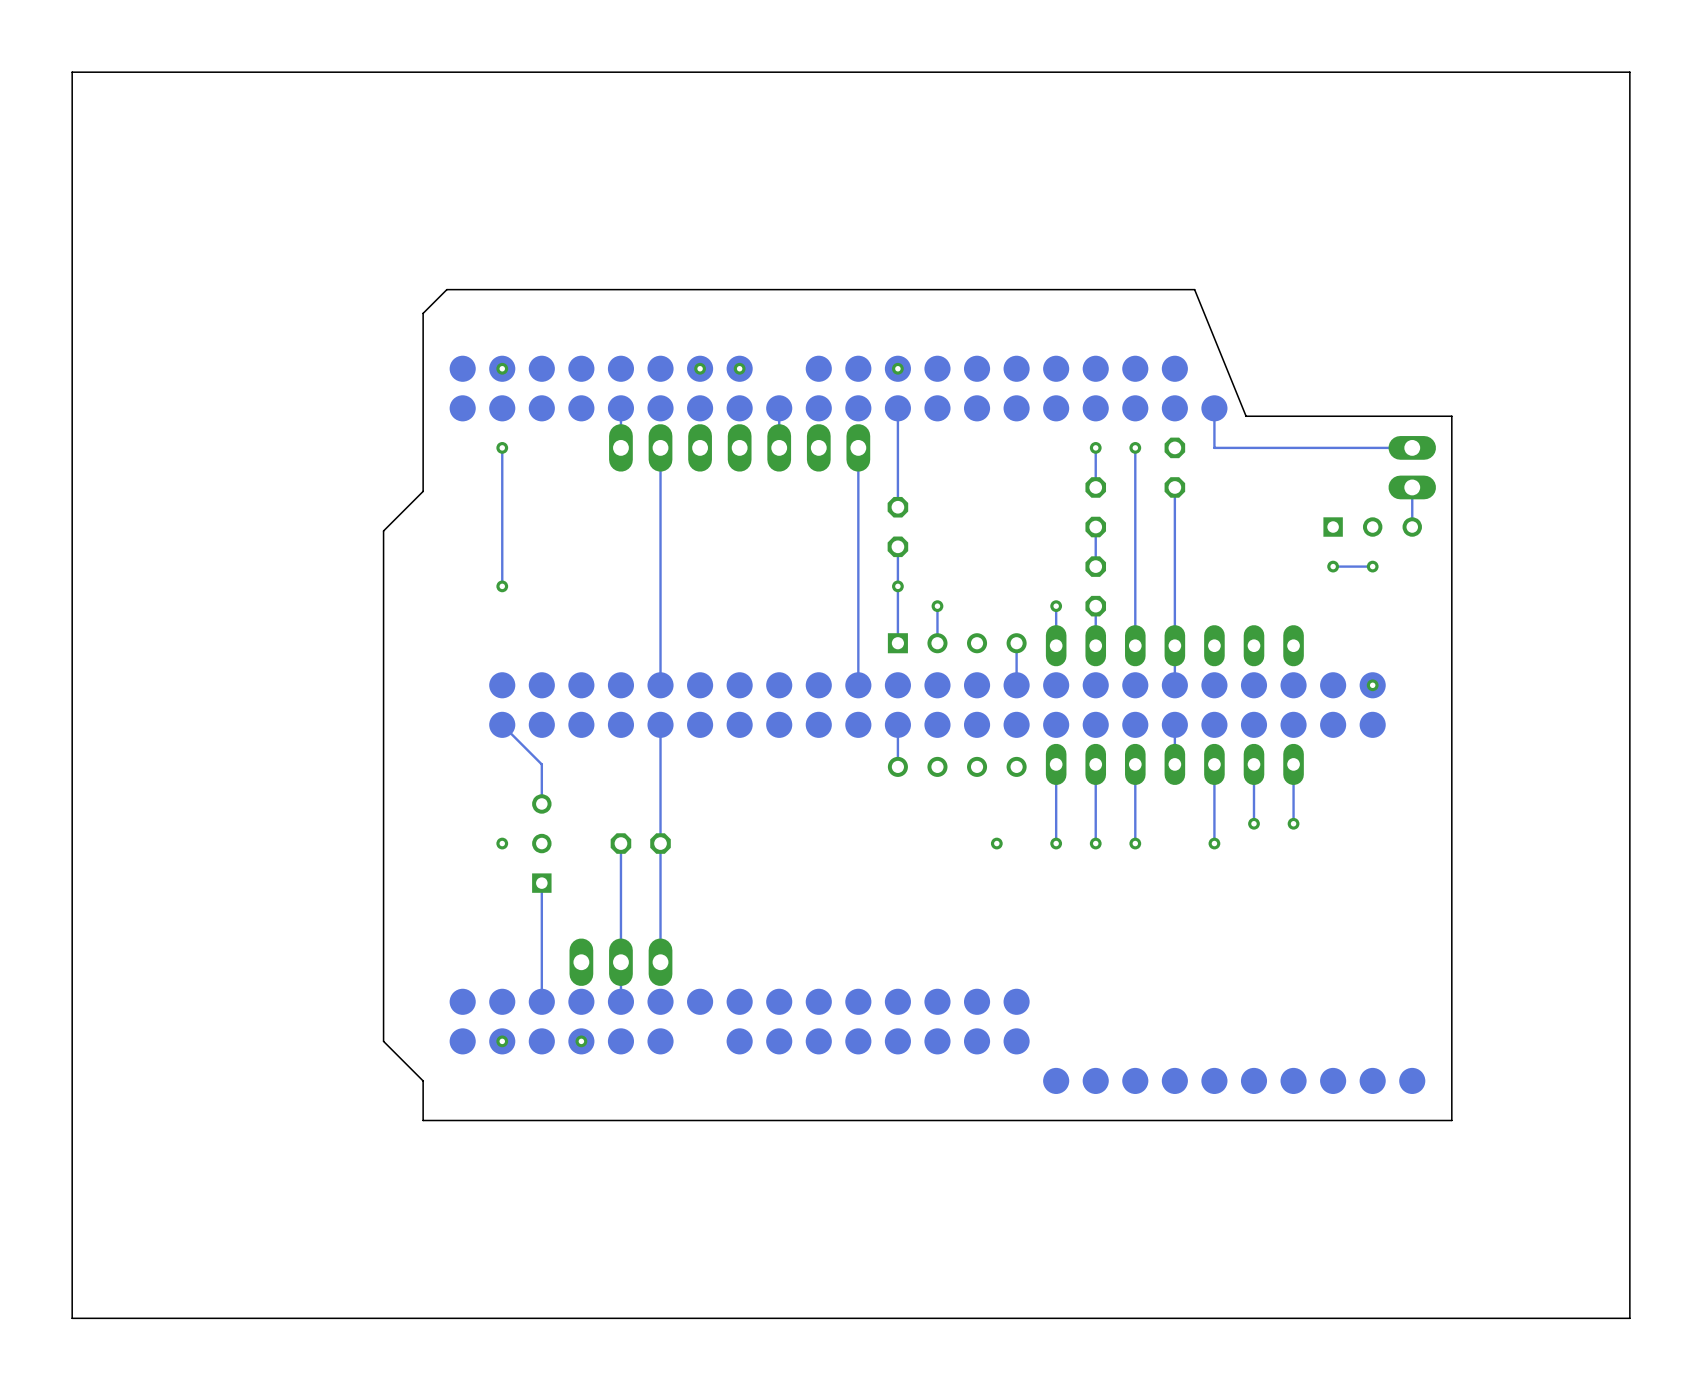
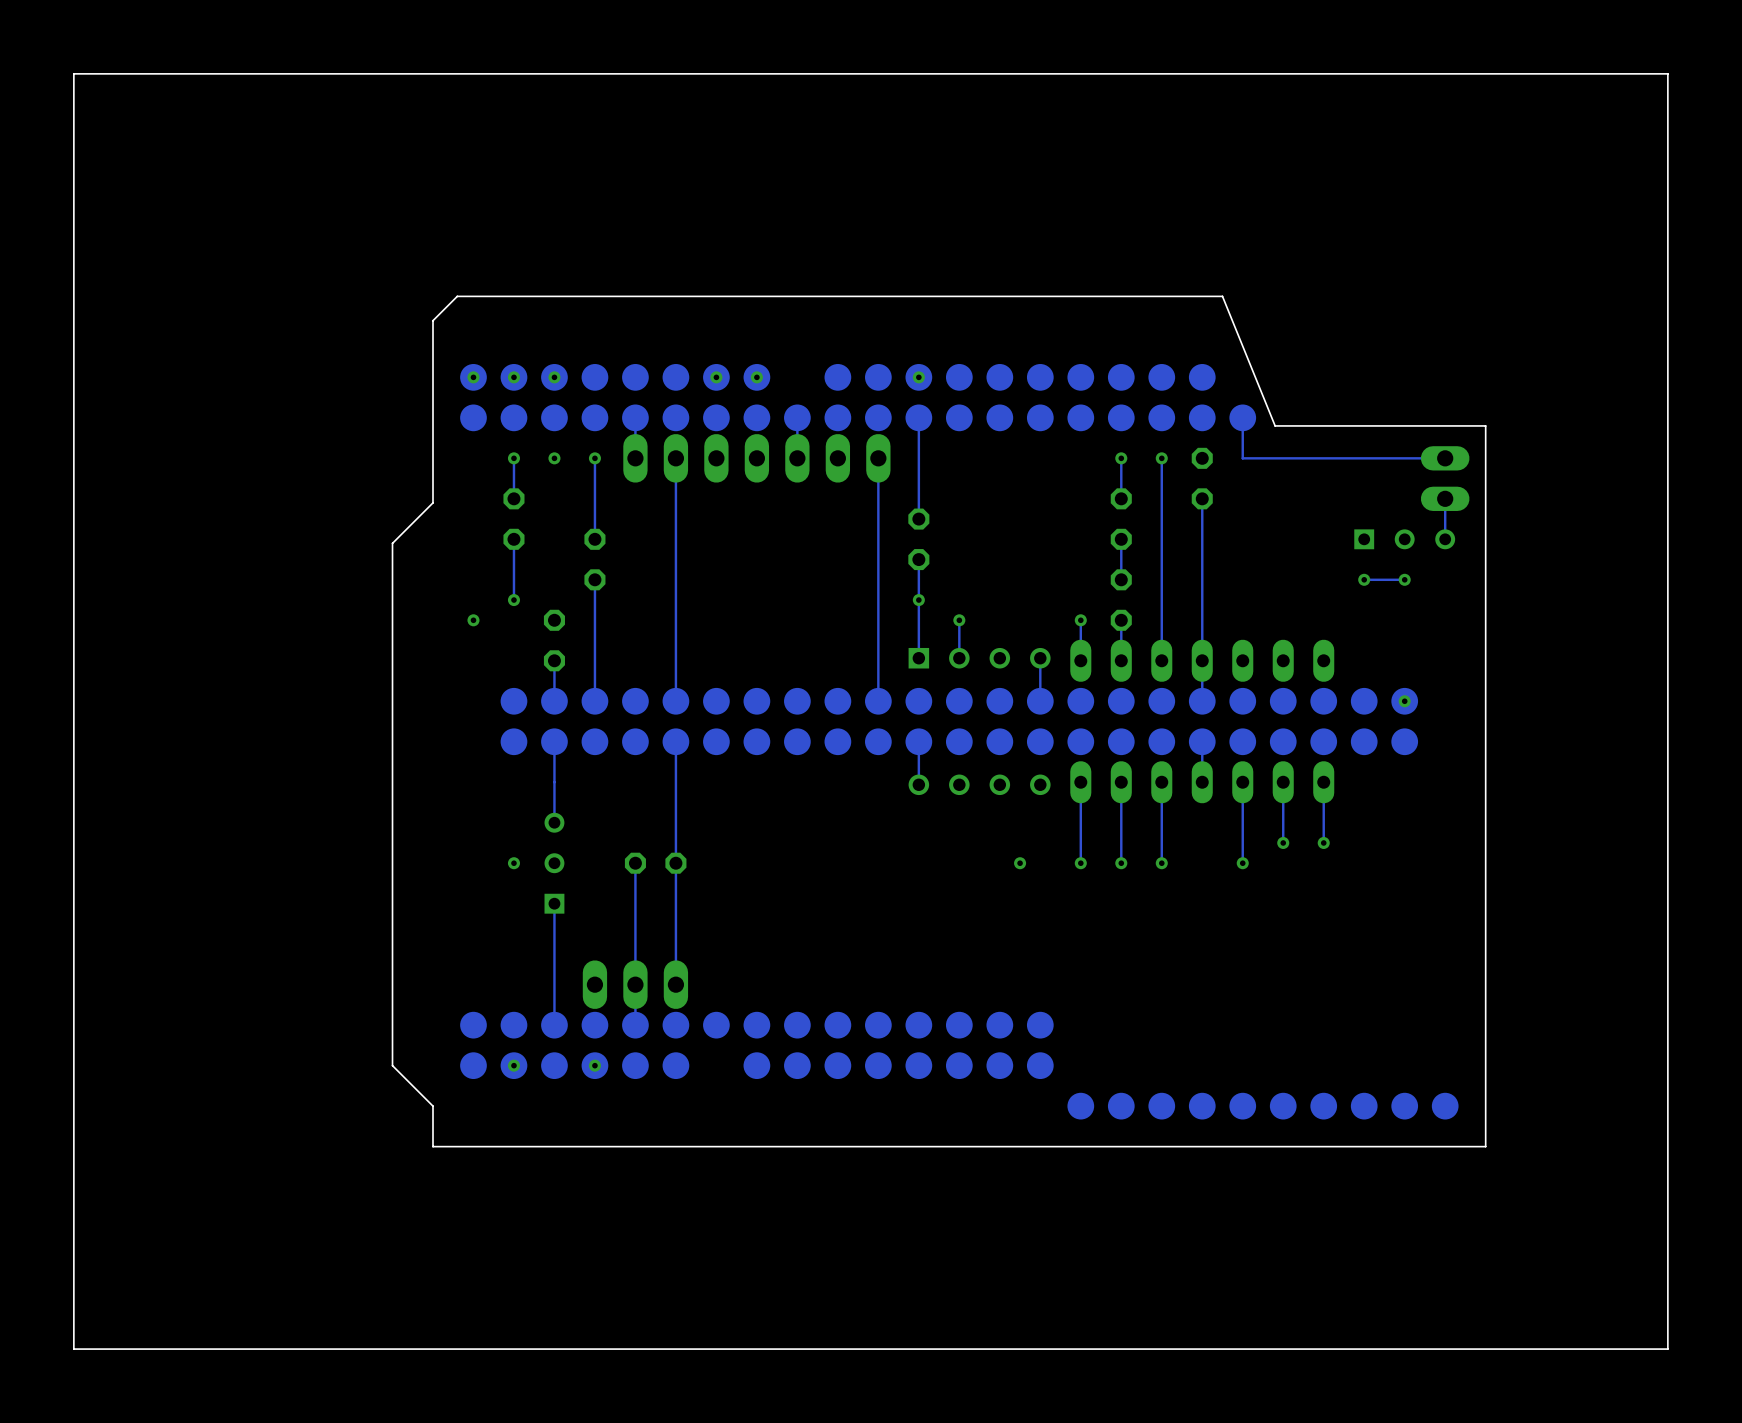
via: none -> (473, 377)
via: none -> (554, 377)
via: none -> (554, 458)
track: none -> (594, 458) (594, 539)
via: none -> (594, 458)
track: (502, 487) (502, 527) -> (554, 660) (554, 701)
part: none -> (513, 519)
part: none -> (594, 559)
track: none -> (594, 579) (594, 701)
via: none -> (473, 620)
part: none -> (554, 640)
track: (502, 724) (541, 764) -> (554, 741) (554, 782)

